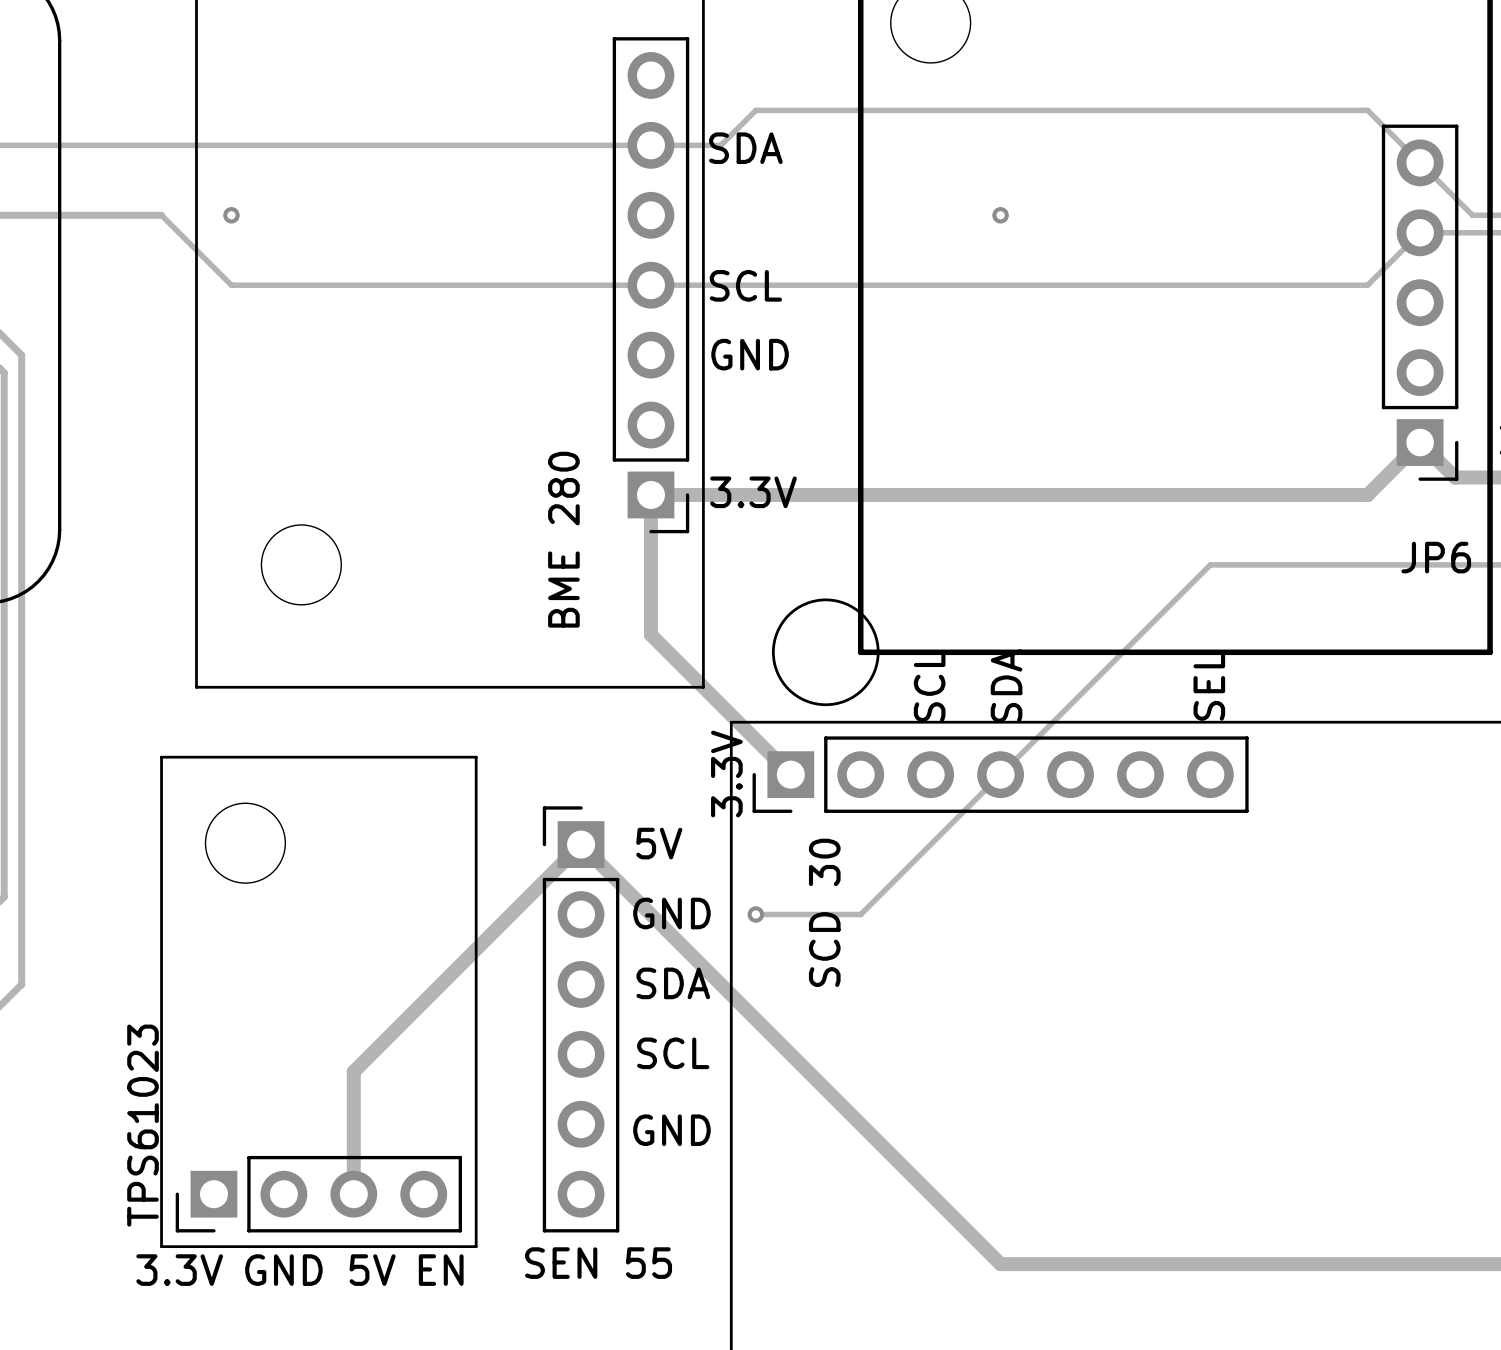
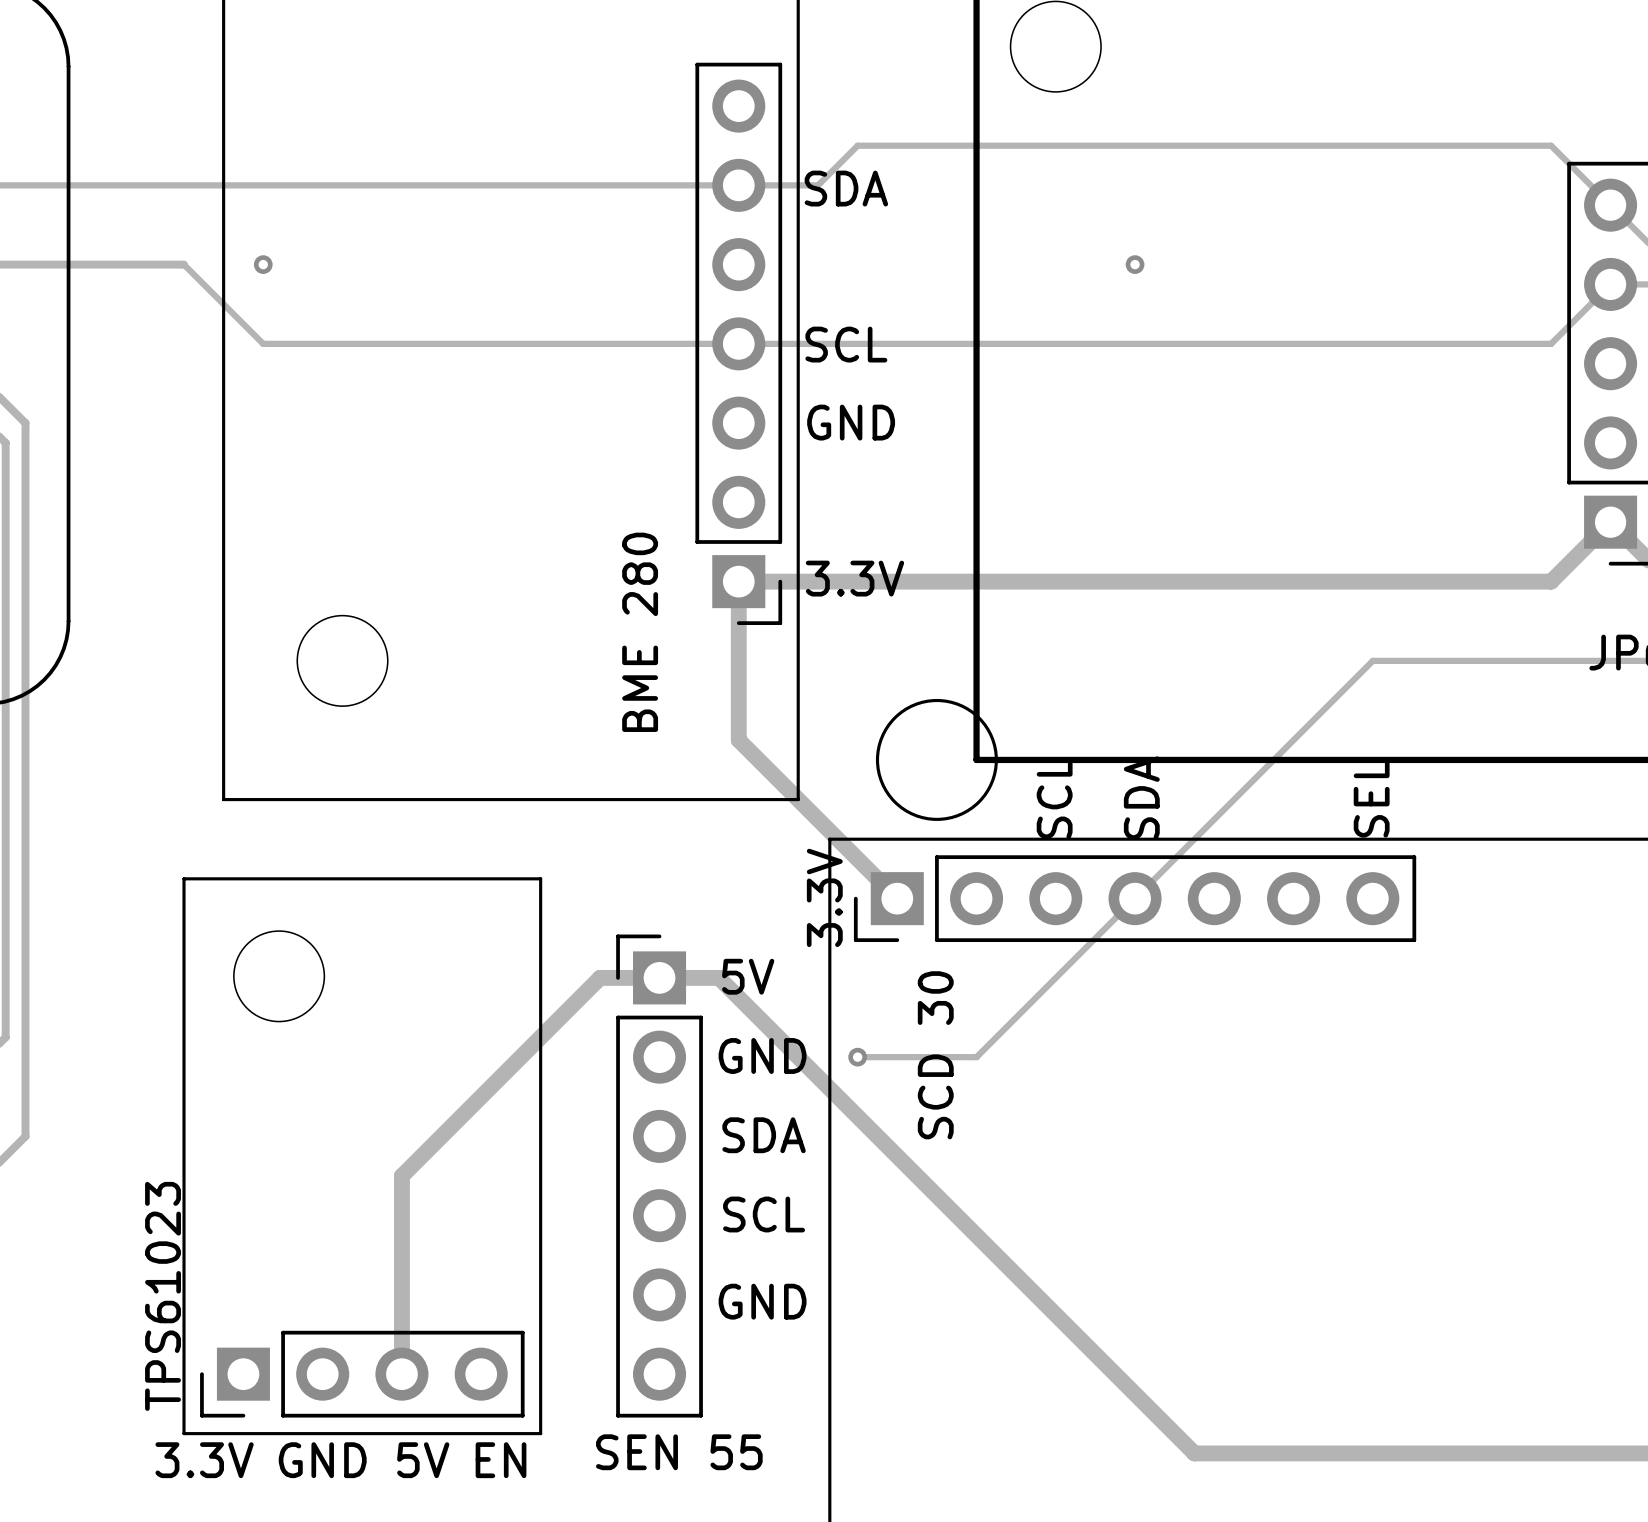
track: (353, 1071) (581, 844) (1000, 1264) (1053, 1264) -> (401, 1235) (401, 1176) (600, 977) (718, 977) (1194, 1453)

